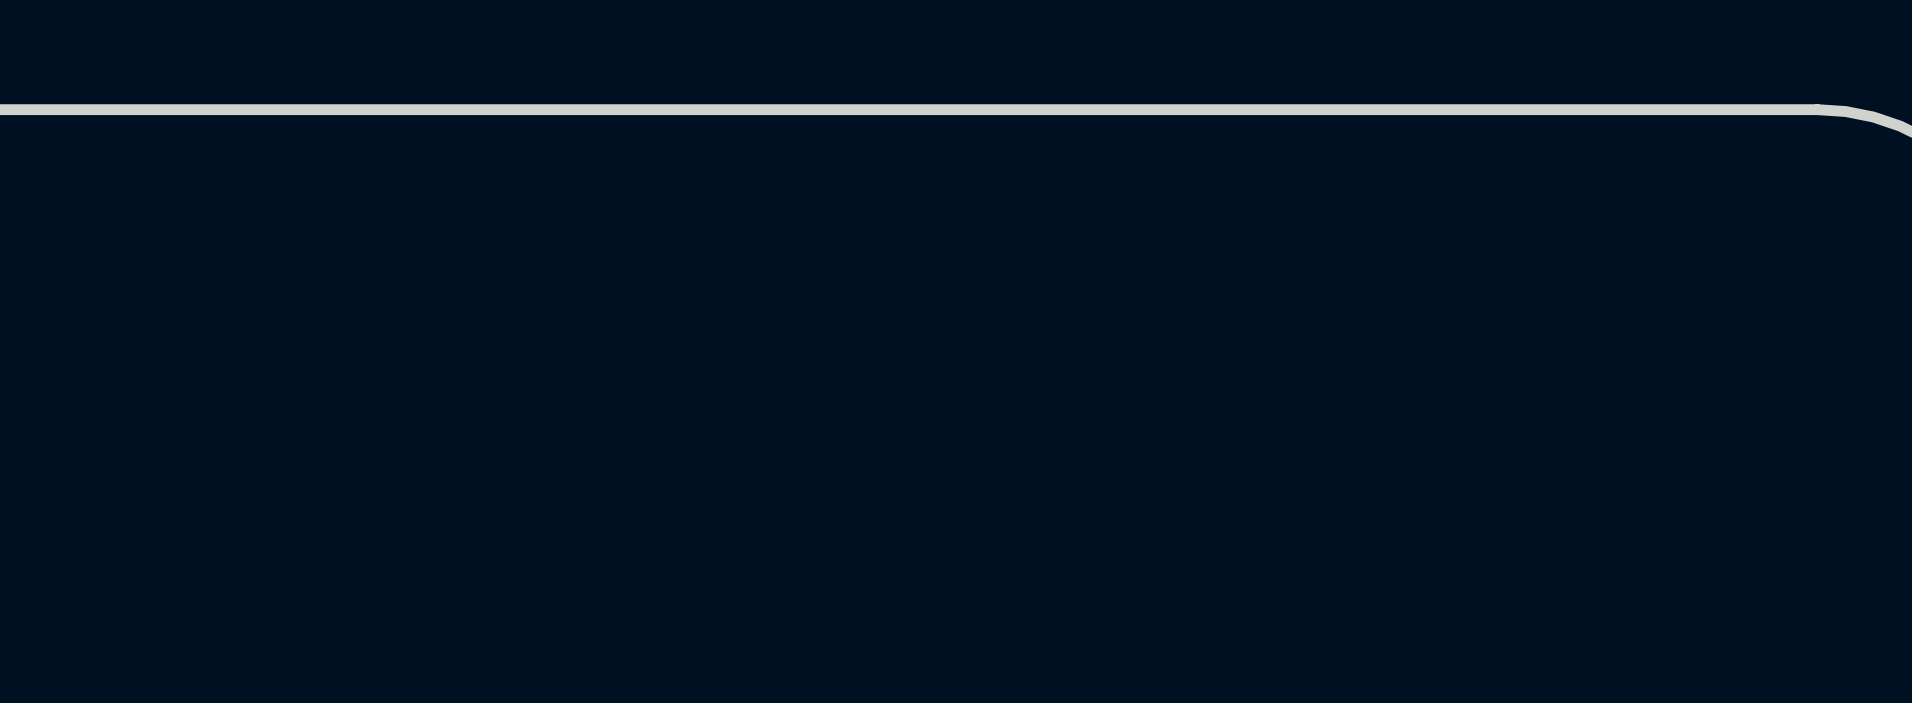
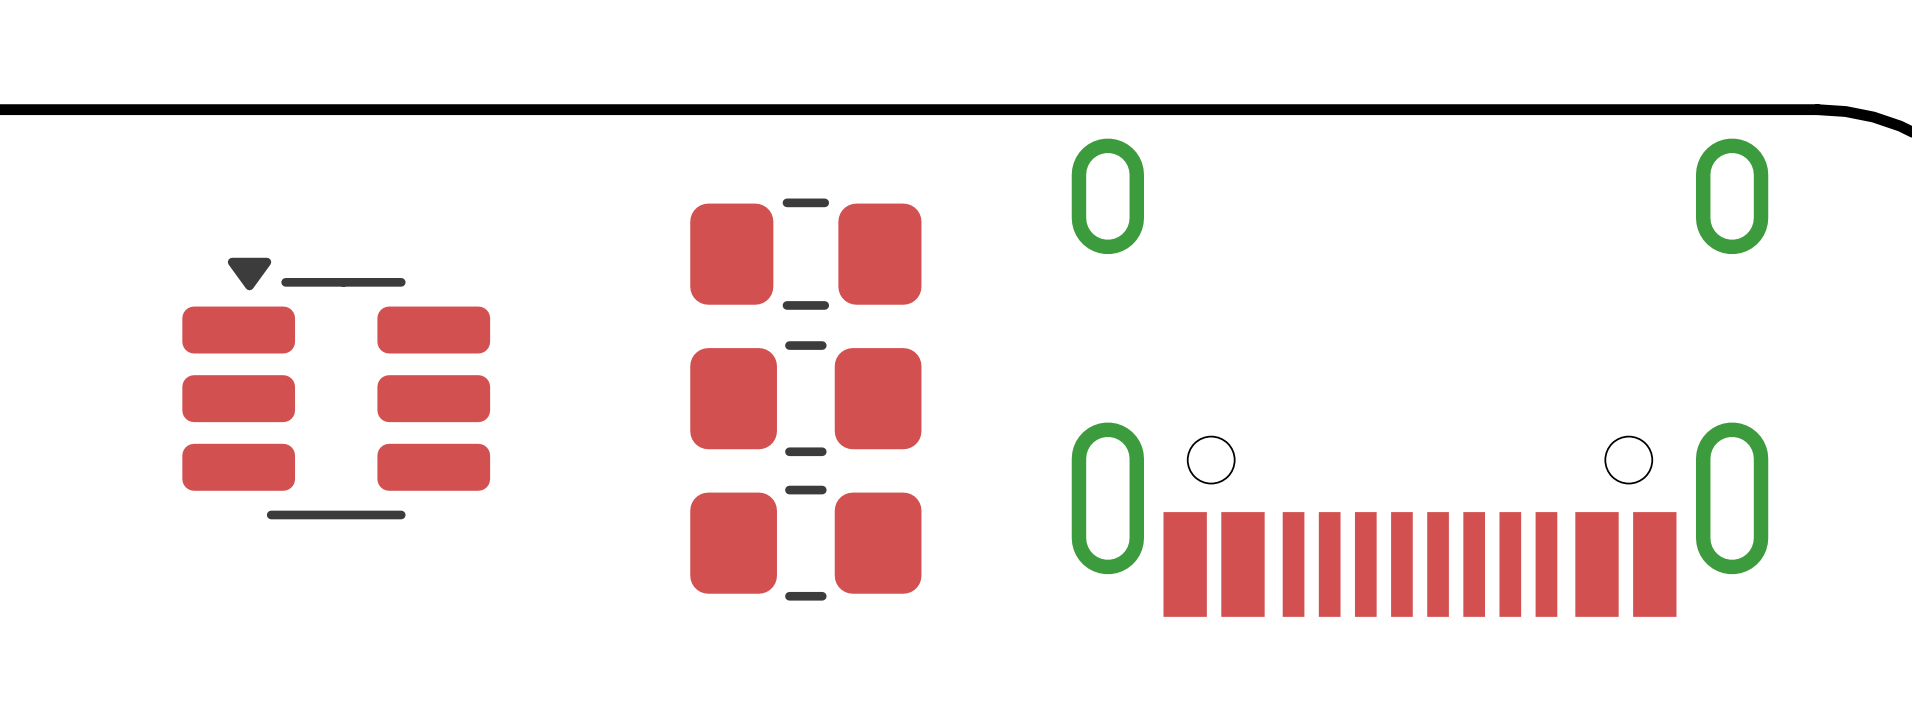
part: none -> (805, 254)
part: none -> (1419, 377)
part: none -> (336, 388)
part: none -> (805, 398)
part: none -> (805, 543)

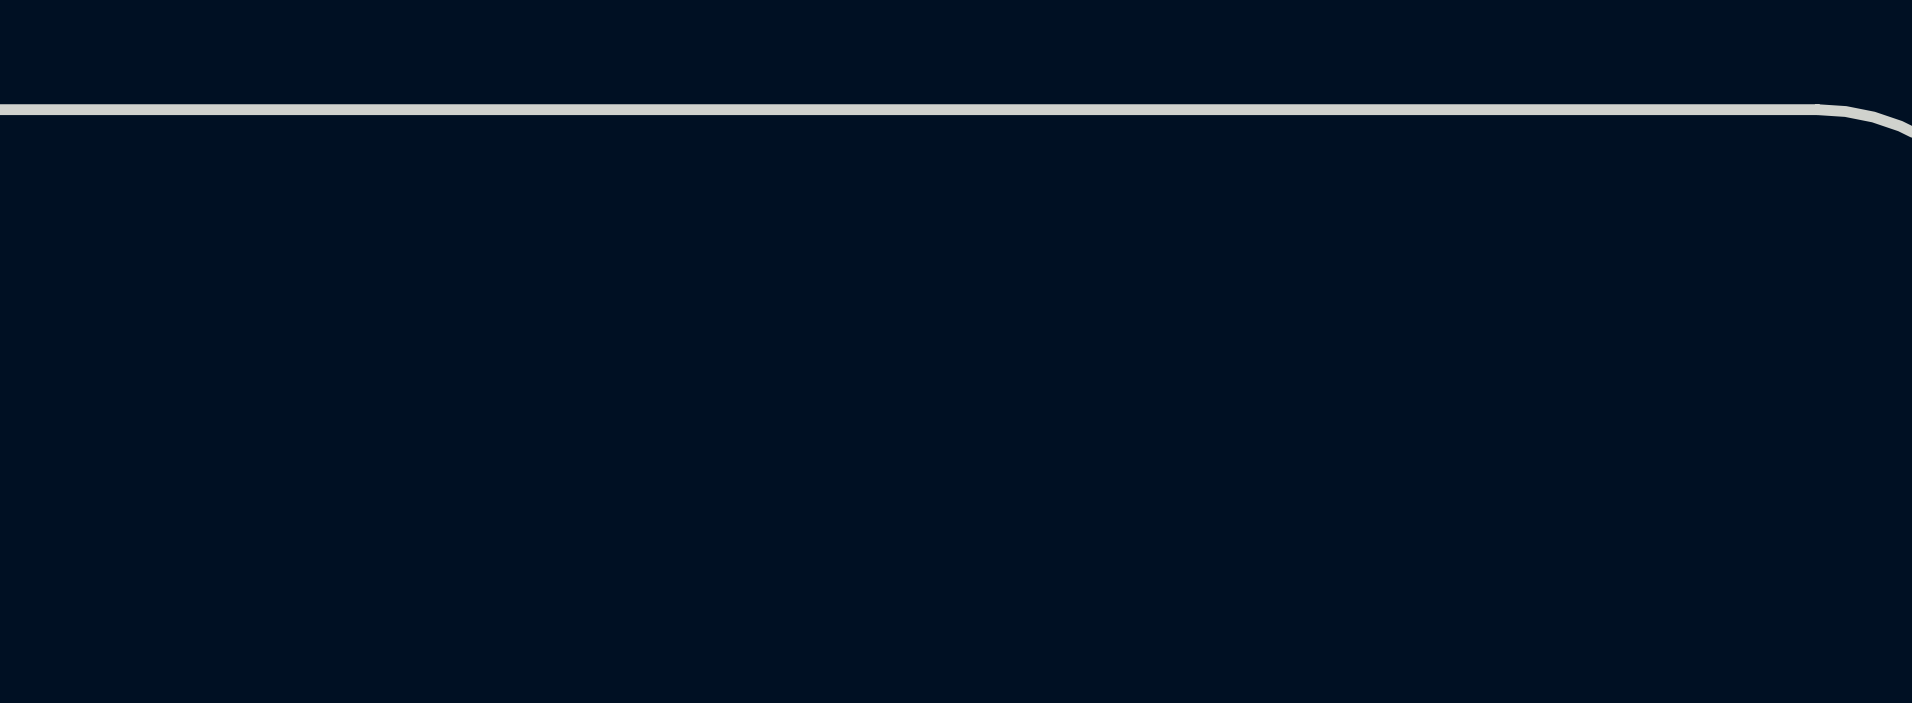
part: (805, 254) -> none
part: (1419, 377) -> none
part: (336, 388) -> none
part: (805, 398) -> none
part: (805, 543) -> none

